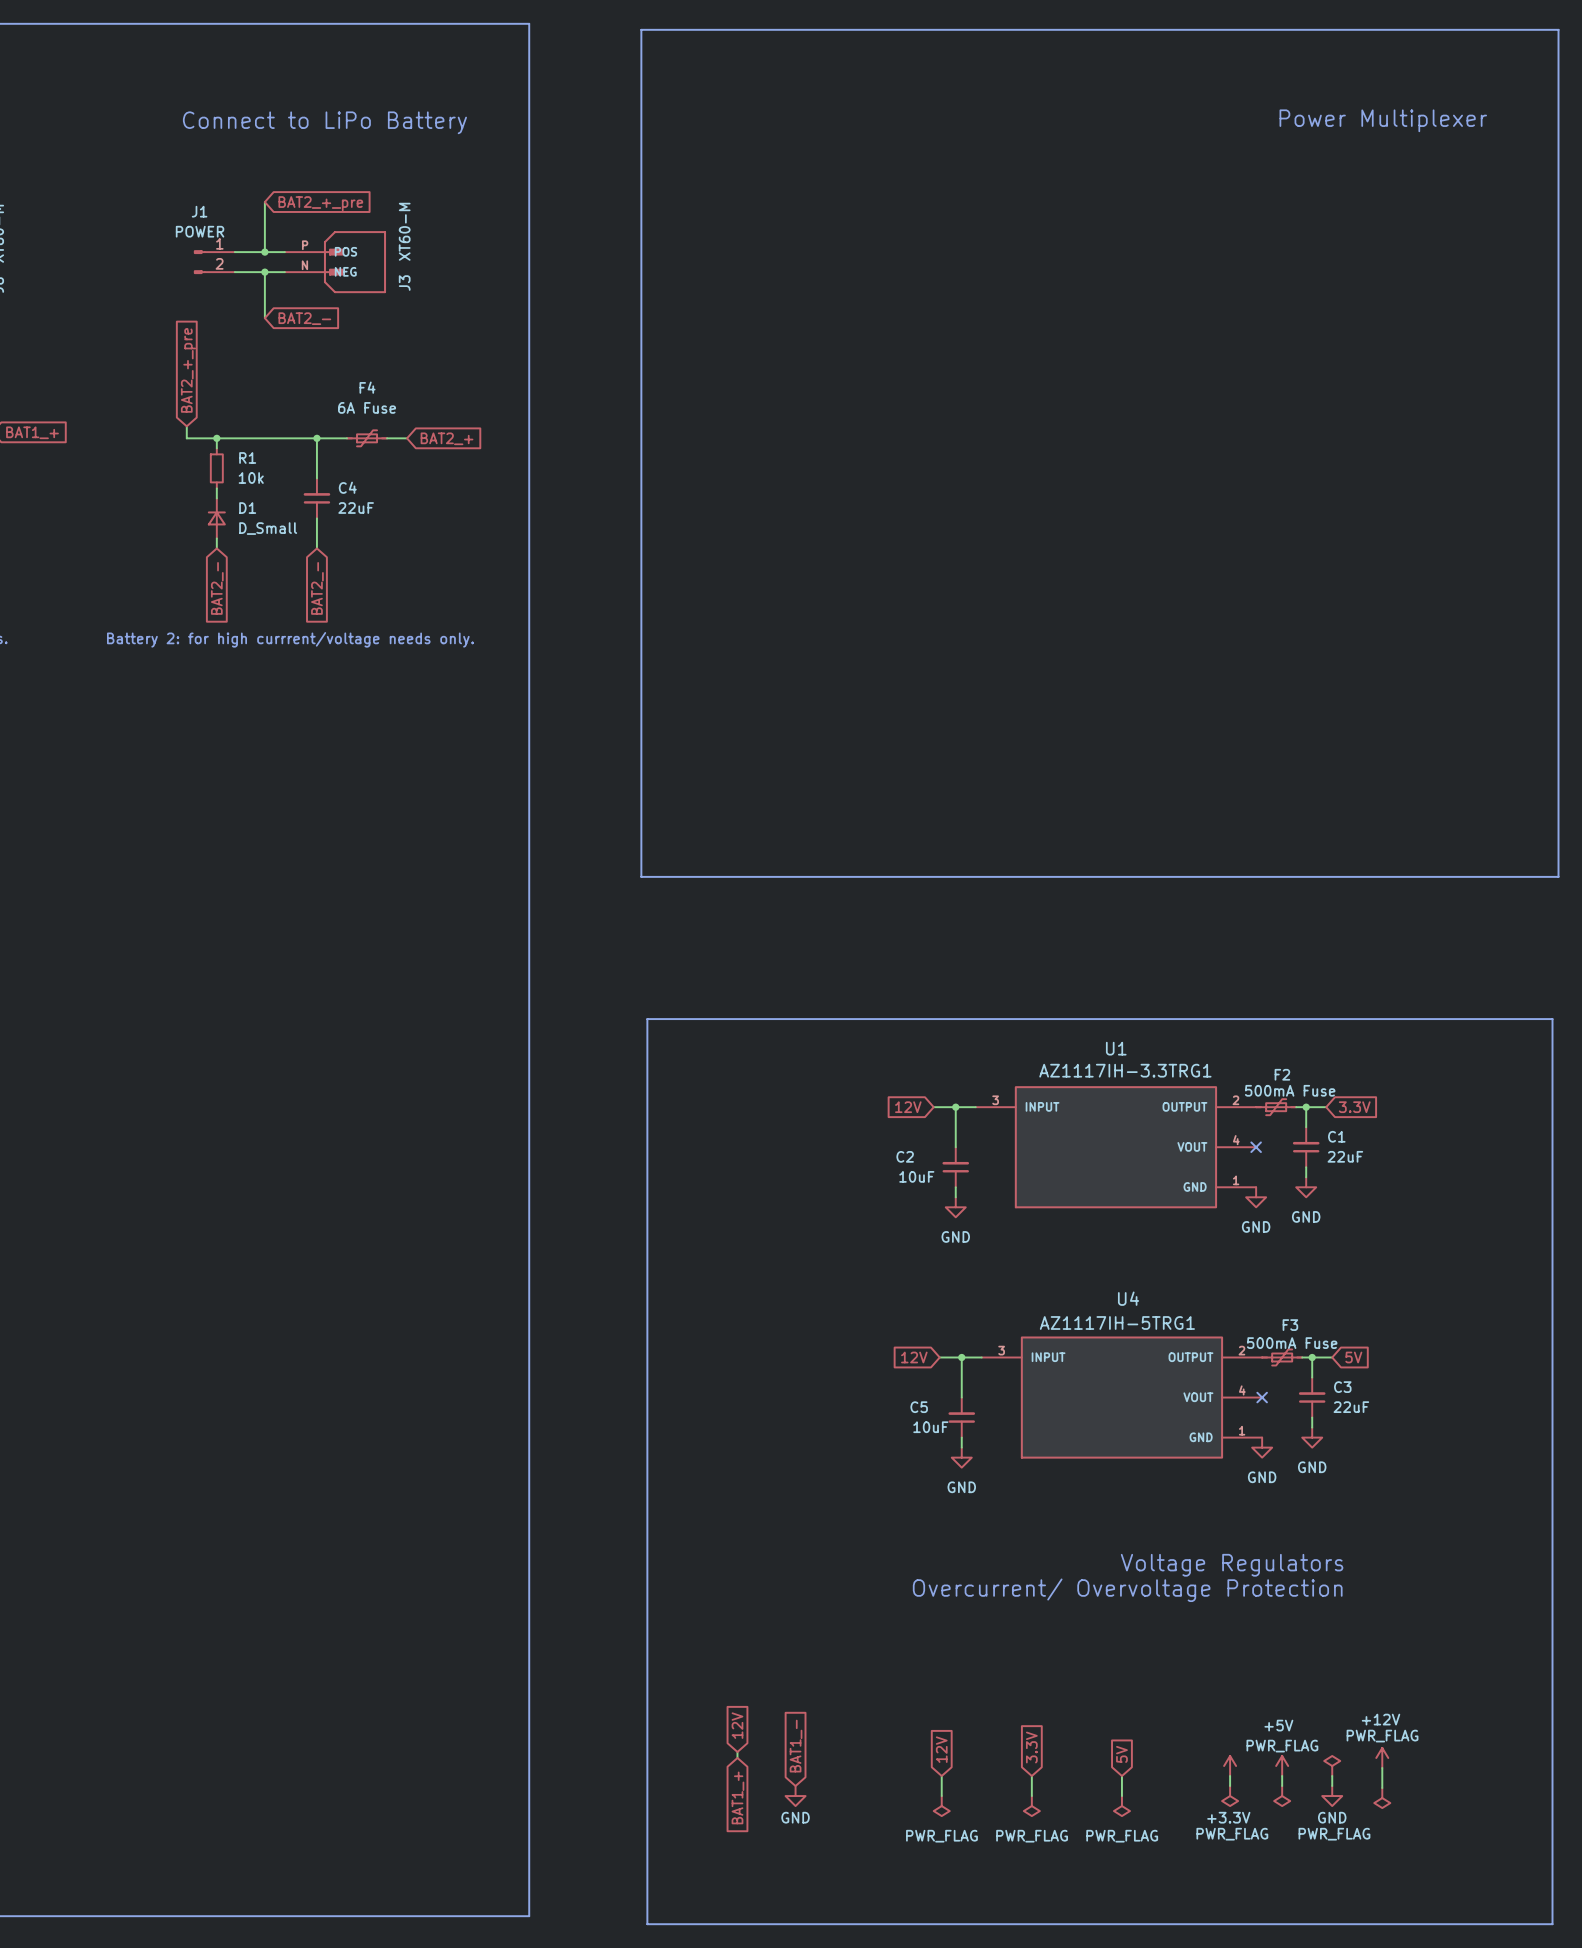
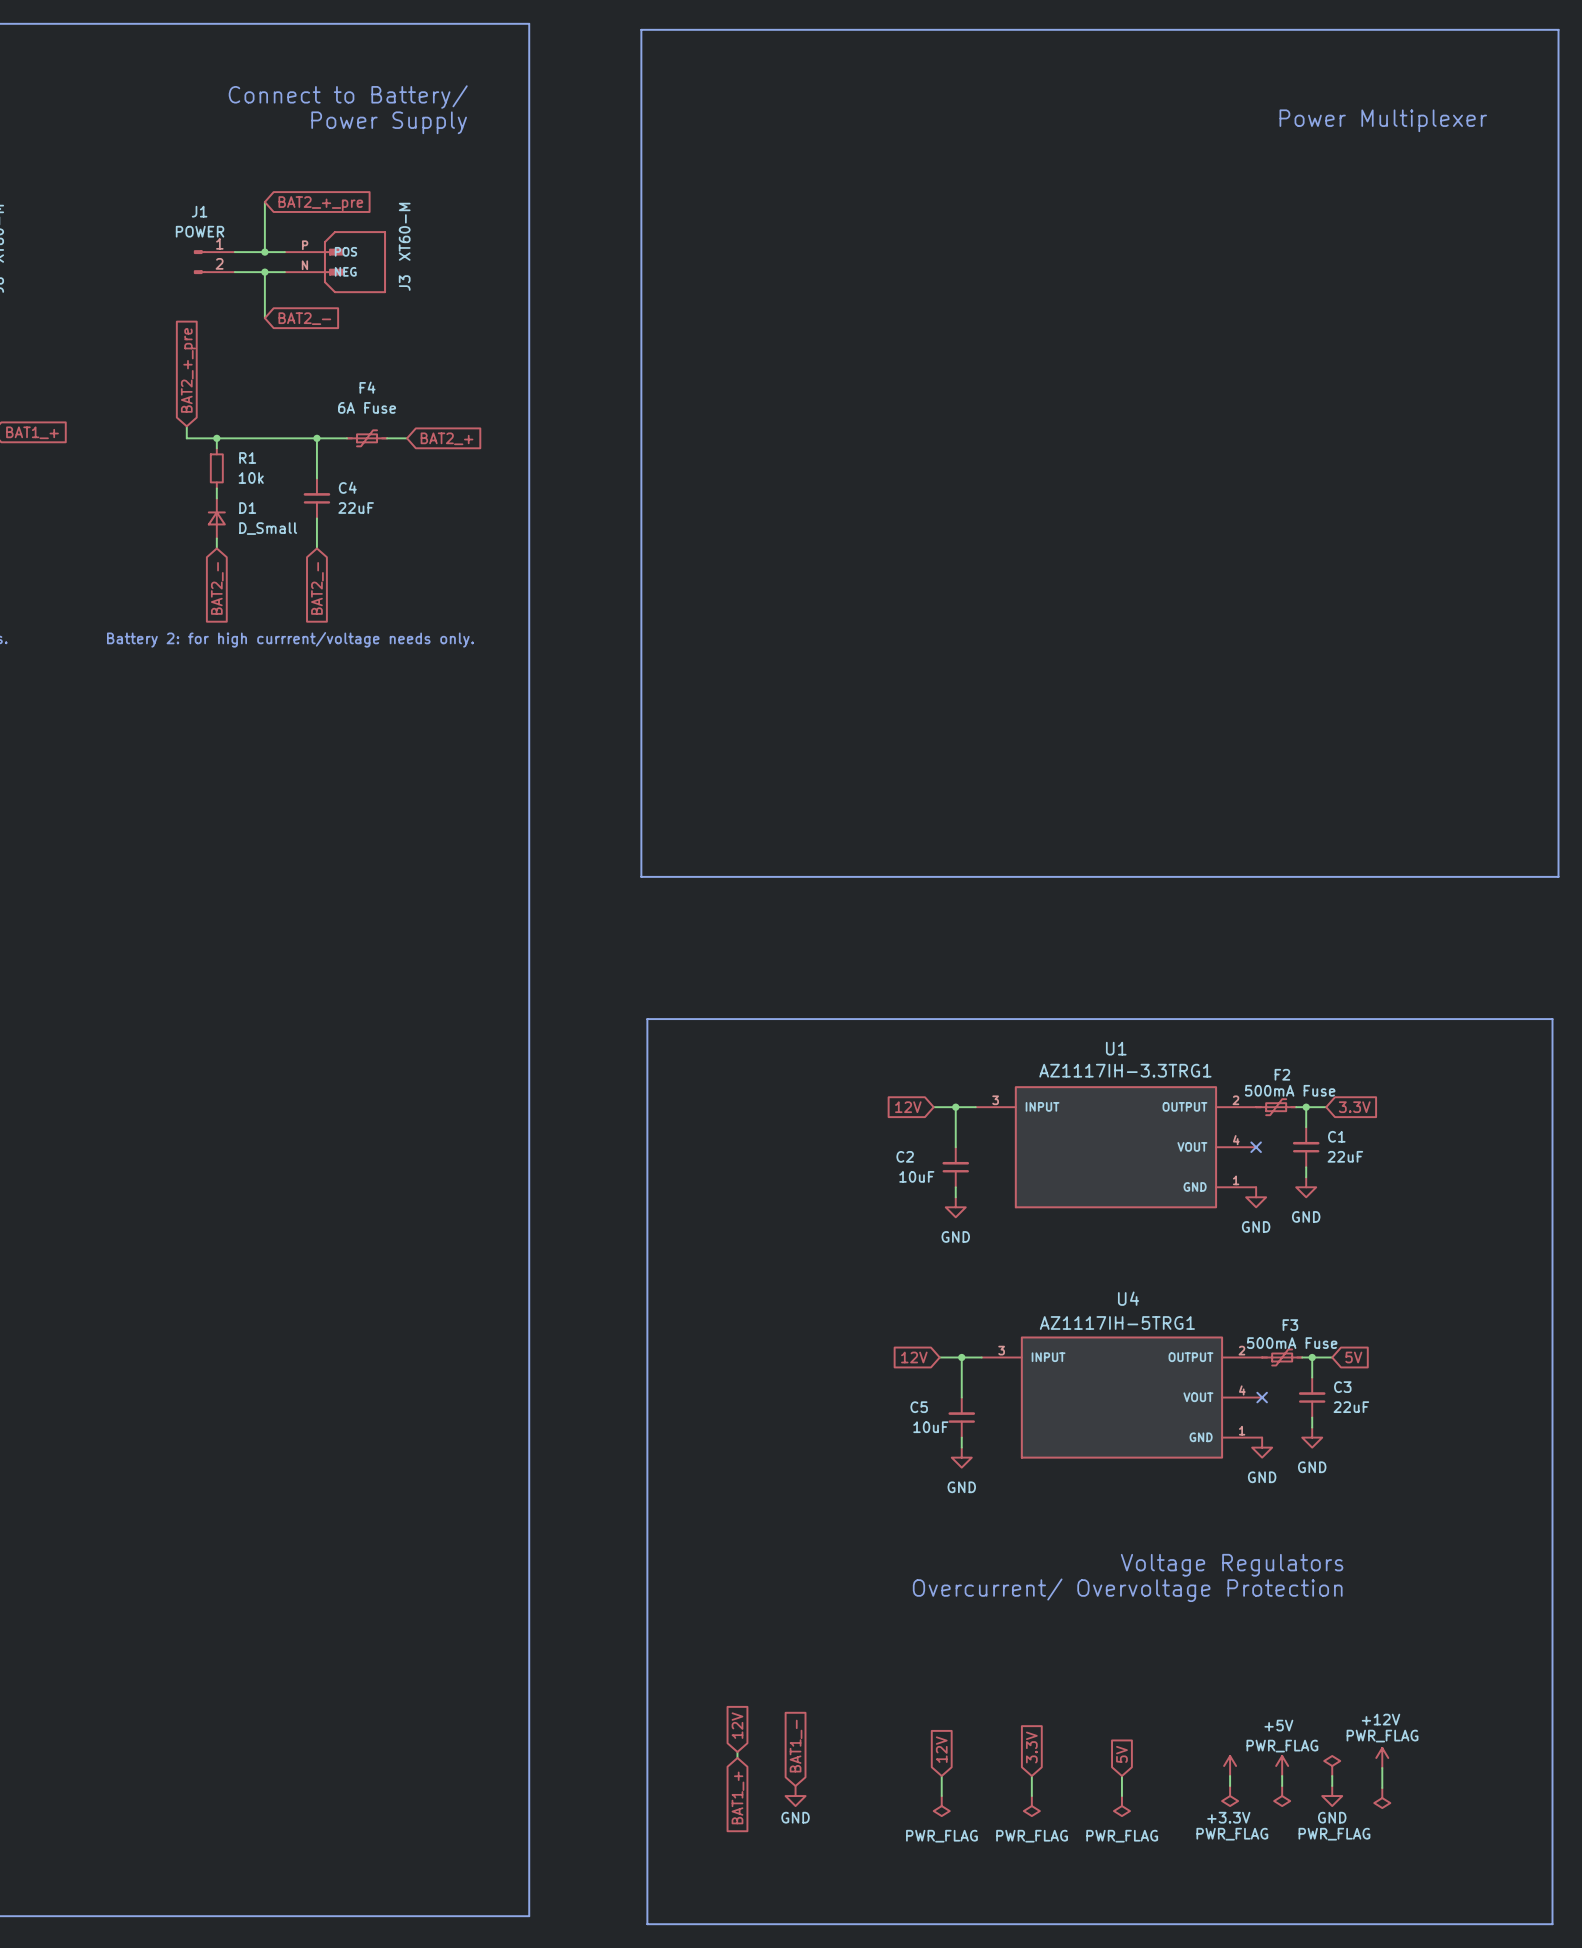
text: none -> Connect to Battery/ (348, 97)
text: Connect to LiPo Battery (324, 122) -> Power Supply (389, 122)

